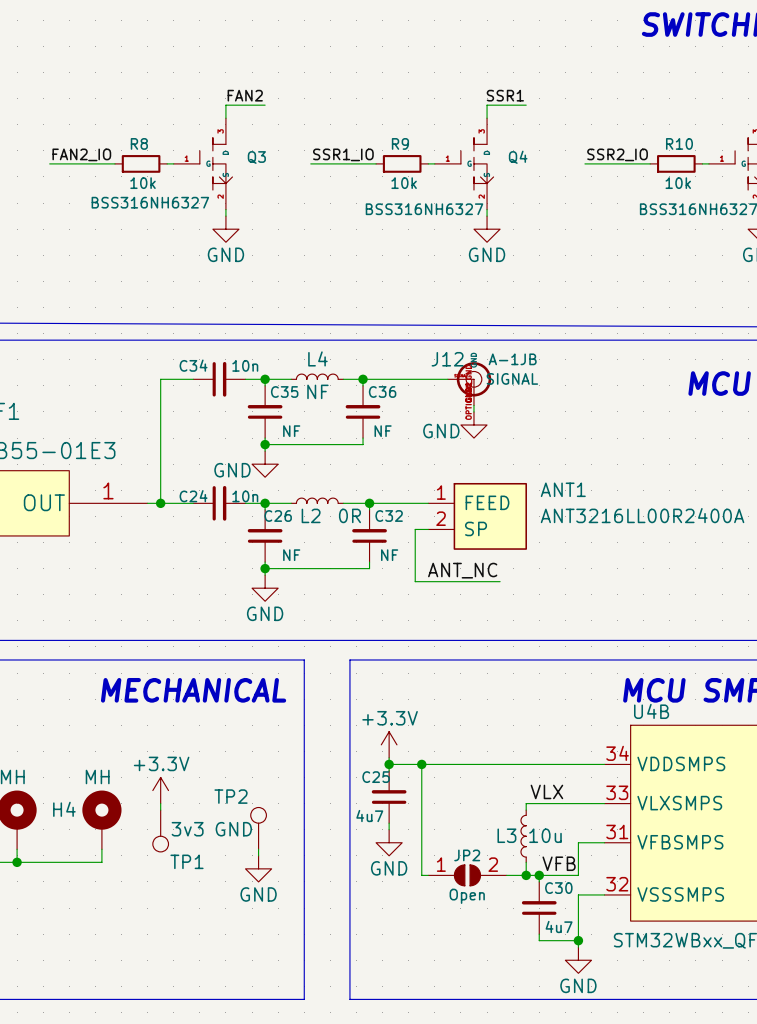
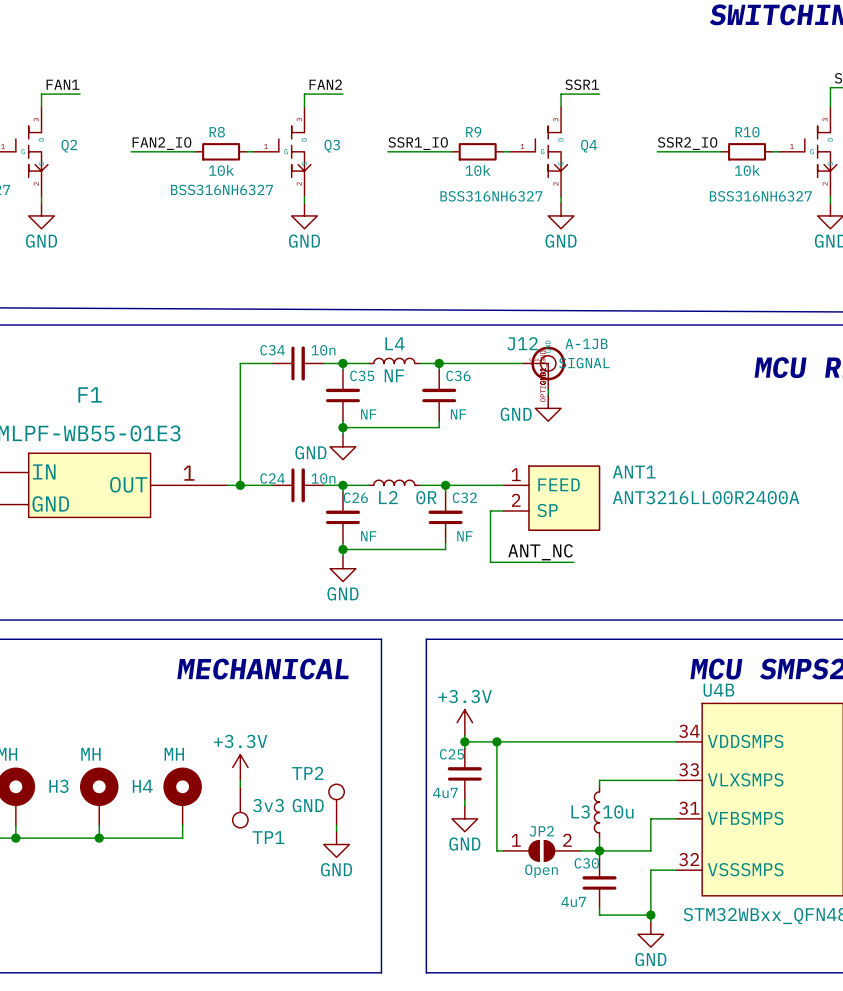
label: VLX (546, 791) -> none
label: VFB (559, 863) -> none
junction: (539, 875) -> none
C30 name position: C30 (558, 888) -> C30 (586, 863)
C30 position: (539, 908) -> (599, 883)
C30 value position: 4u7 (559, 926) -> 4u7 (573, 901)
wire: (539, 934) (539, 940) -> (599, 908) (599, 915) (612, 915)

